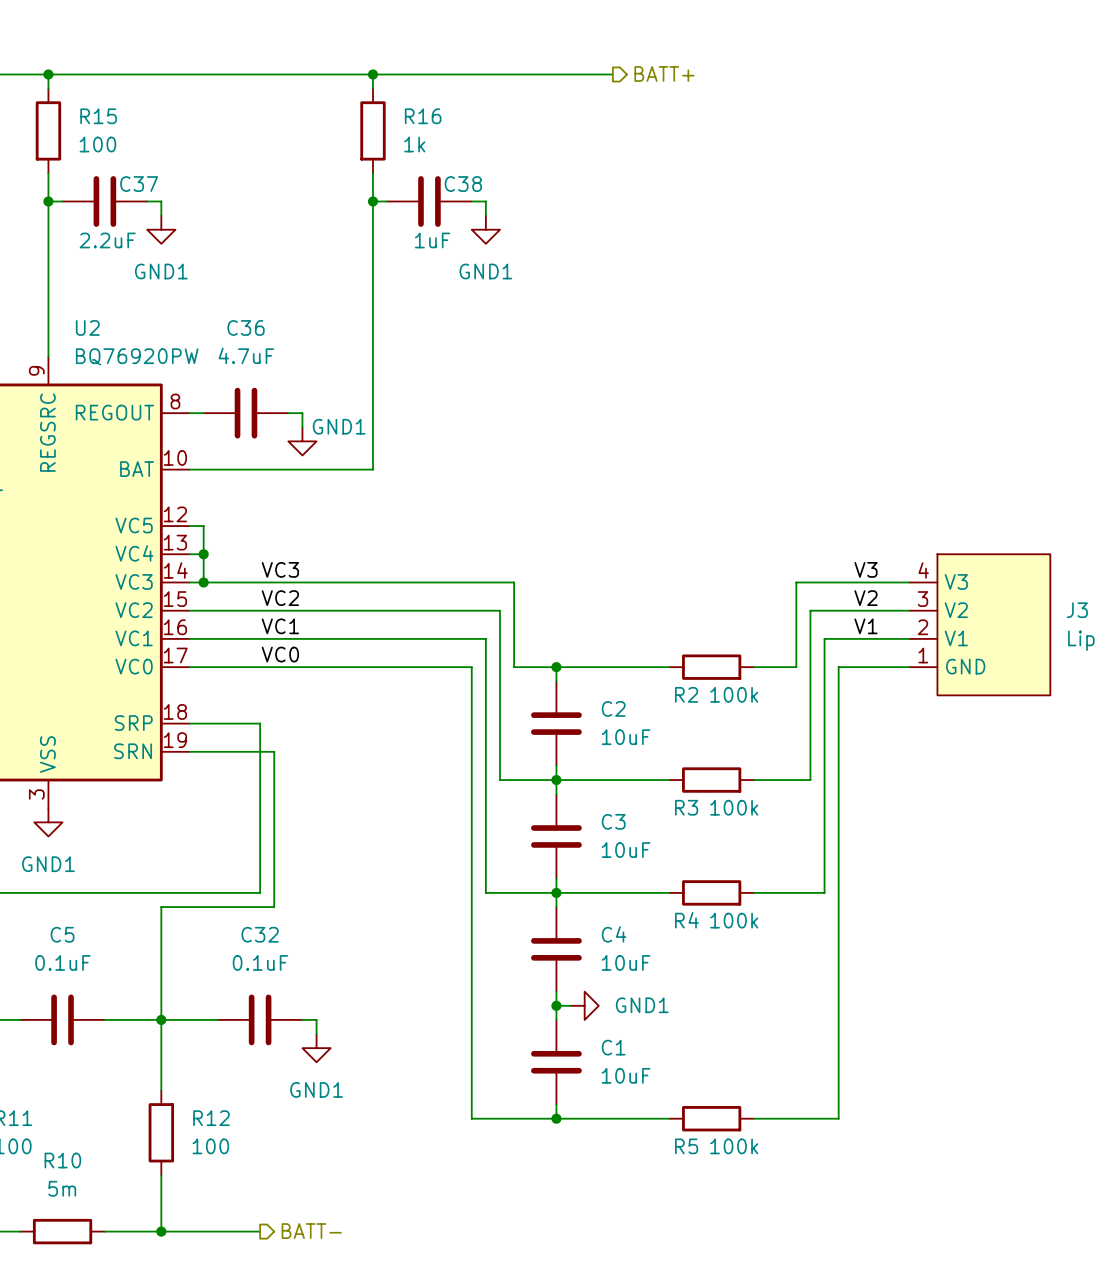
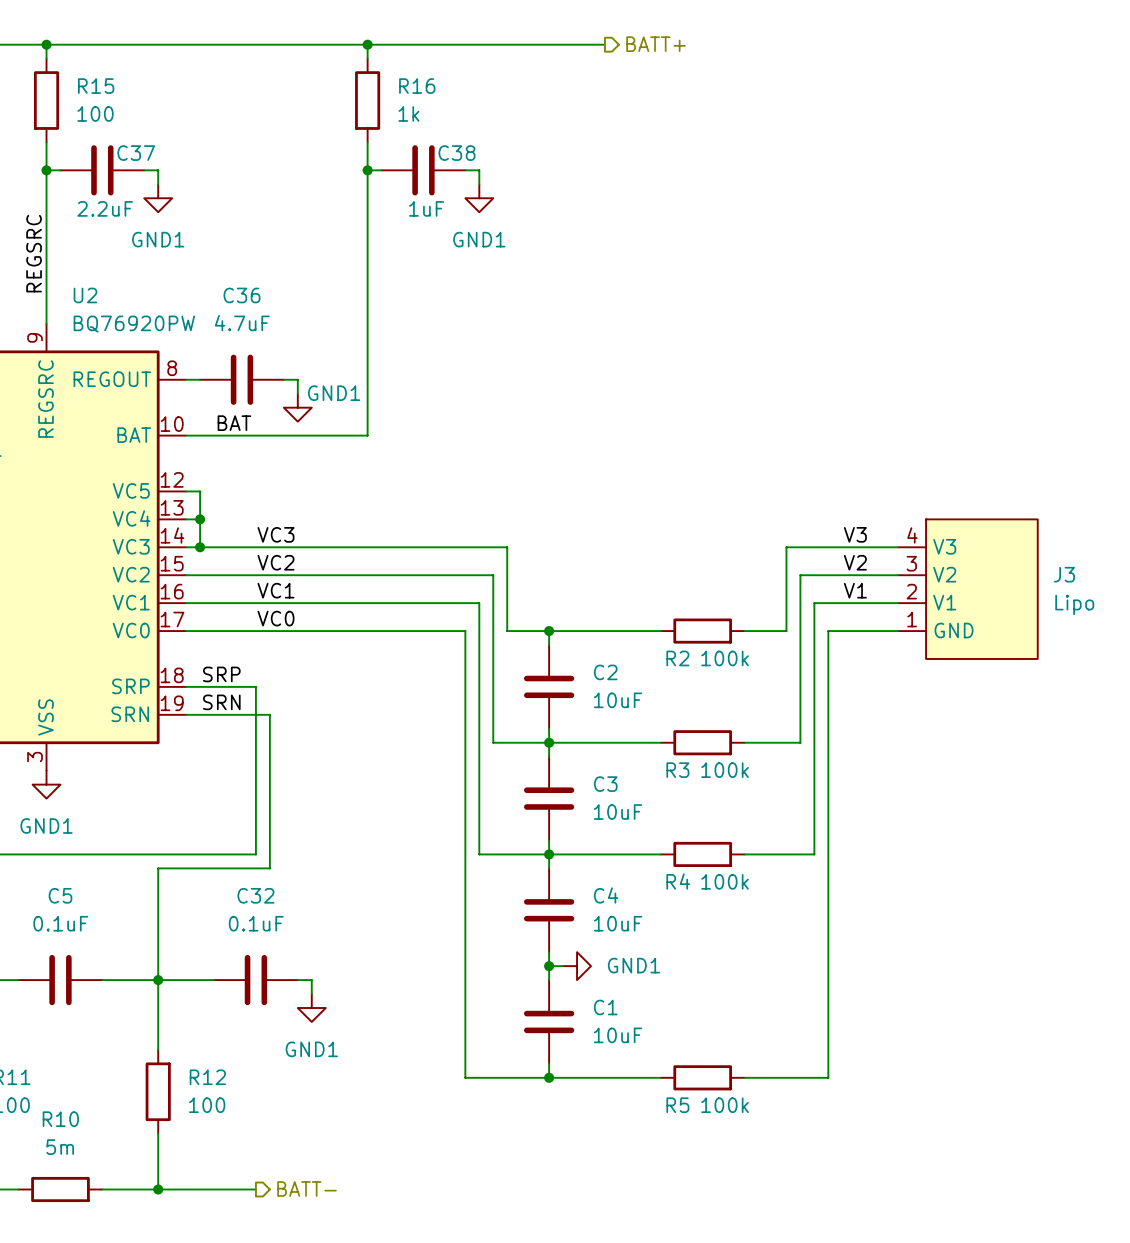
label: none -> REGSRC (34, 253)
label: none -> BAT (234, 423)
label: none -> SRP (221, 674)
label: none -> SRN (221, 702)

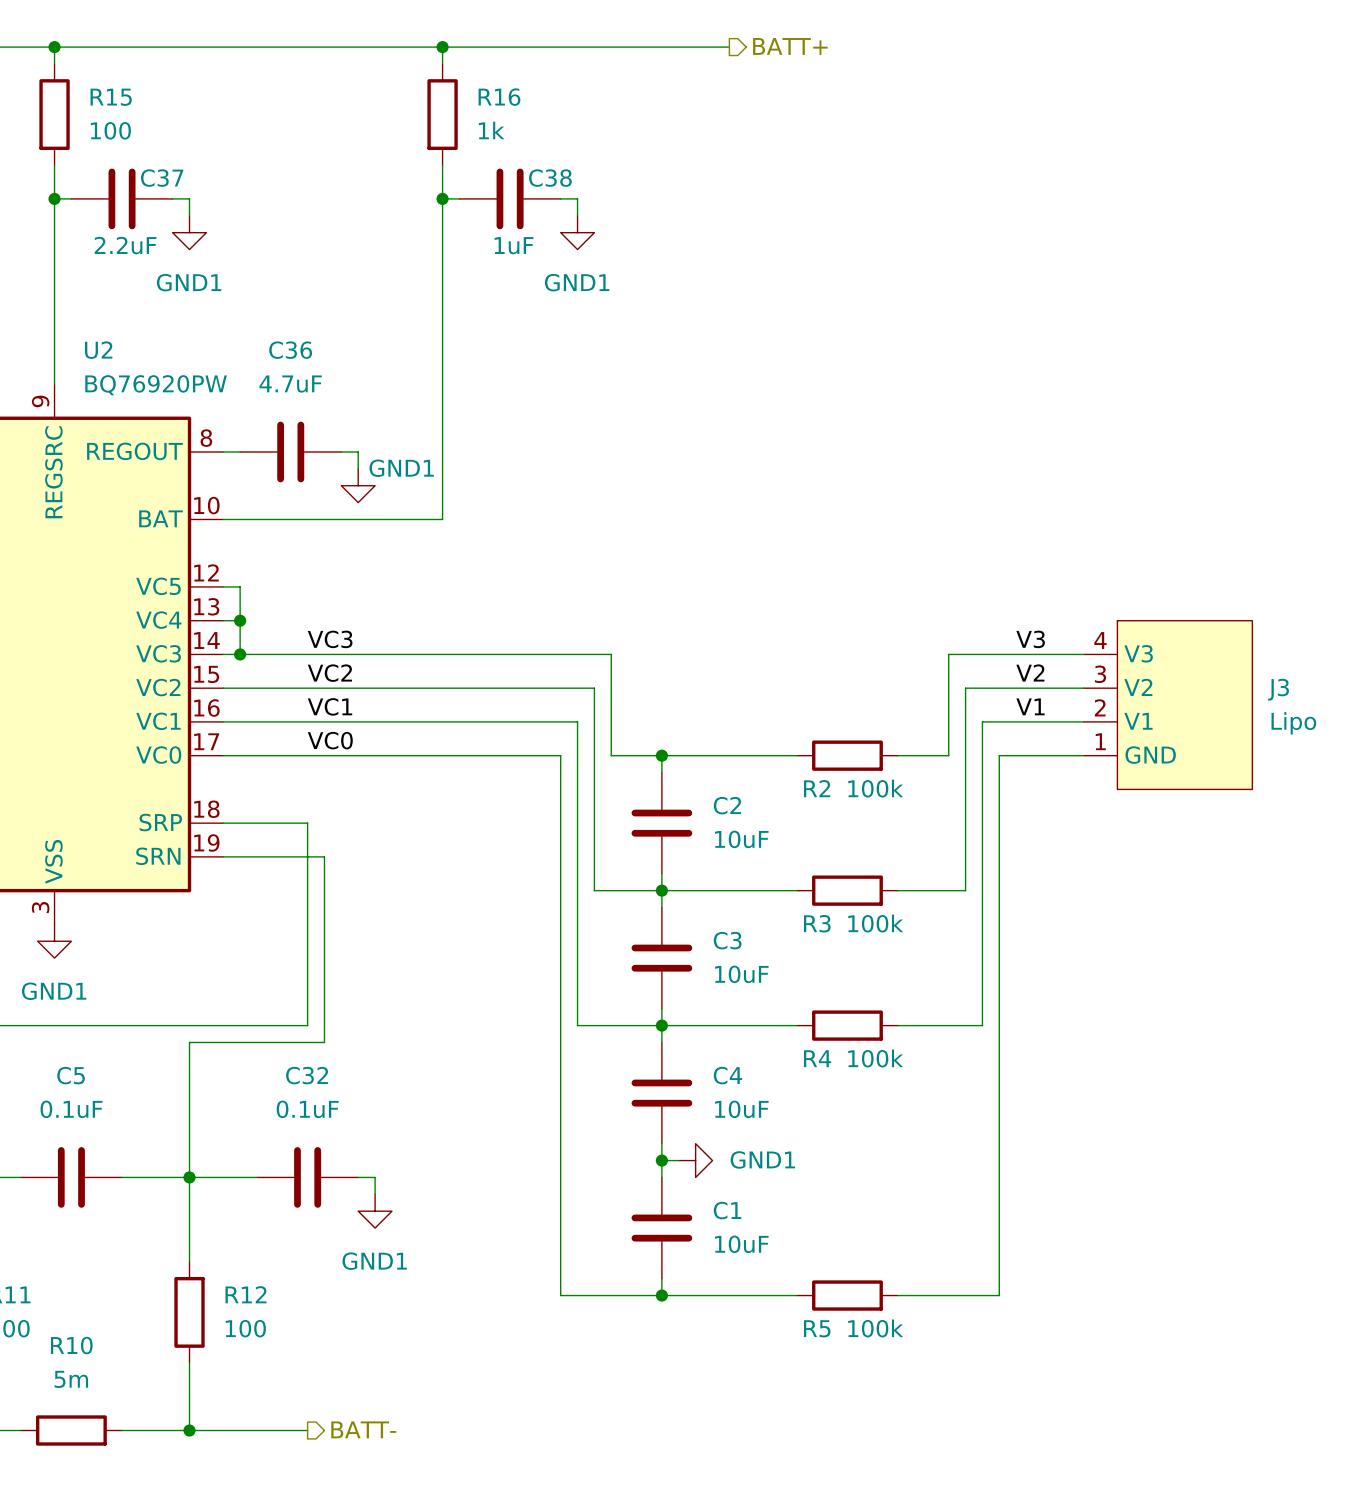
label: REGSRC (34, 253) -> none
label: BAT (234, 423) -> none
label: SRP (221, 674) -> none
label: SRN (221, 702) -> none

